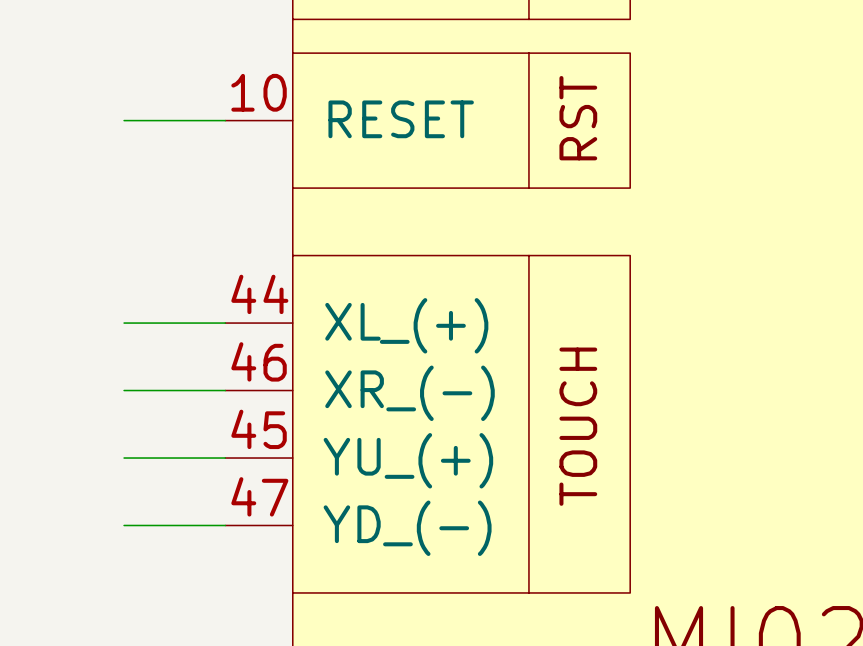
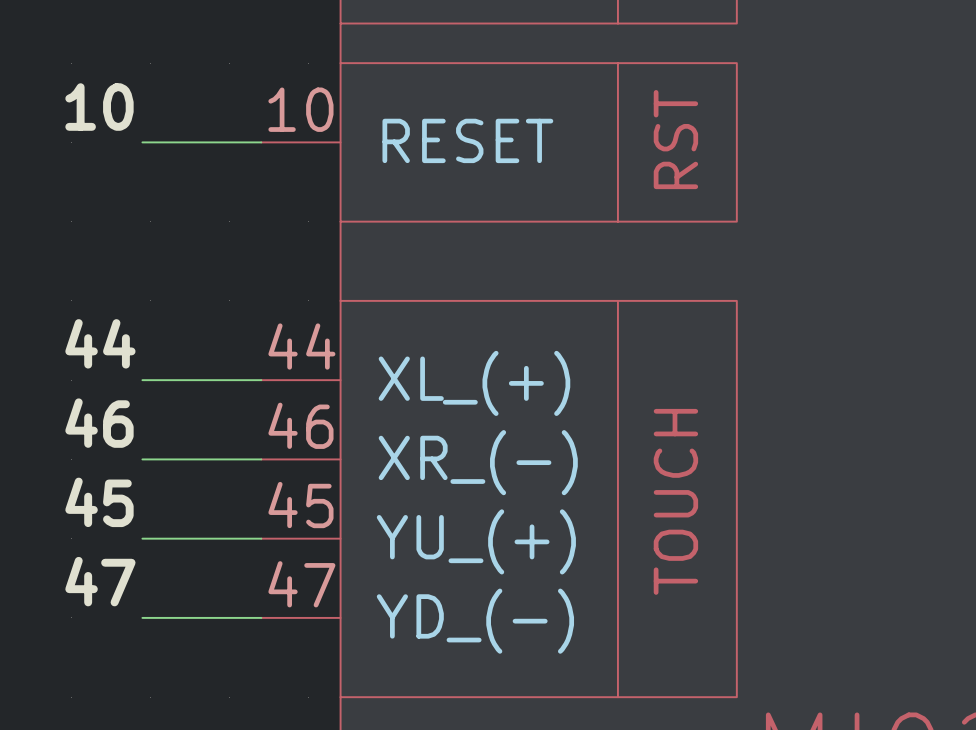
label: none -> 10 (99, 107)
label: none -> 44 (100, 343)
label: none -> 46 (99, 423)
label: none -> 45 (99, 502)
label: none -> 47 (100, 581)

